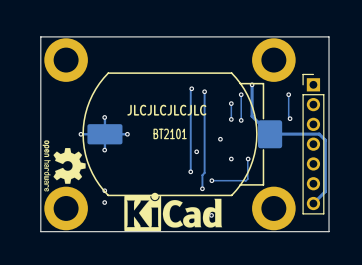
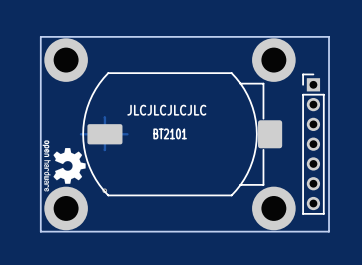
track: (252, 84) (252, 116) (270, 134) (319, 134) (325, 140) (325, 191) (313, 203) -> none
via: (252, 84) -> none
track: (191, 88) (190, 171) -> none
via: (191, 88) -> none
track: (204, 91) (204, 172) (202, 175) (202, 188) -> none
via: (204, 91) -> none
track: (241, 94) (241, 120) -> none
via: (241, 94) -> none
track: (288, 94) (290, 118) -> none
via: (288, 94) -> none
track: (231, 103) (231, 119) -> none
via: (231, 103) -> none
via: (104, 117) -> none
via: (290, 118) -> none
via: (231, 119) -> none
via: (241, 120) -> none
via: (80, 134) -> none
via: (127, 134) -> none
via: (220, 139) -> none
via: (104, 150) -> none
via: (196, 151) -> none
via: (231, 159) -> none
track: (248, 159) (246, 180) (211, 180) -> none
via: (248, 159) -> none
via: (190, 171) -> none
via: (211, 180) -> none
via: (202, 188) -> none
drawing: [124, 192, 223, 232] -> none
via: (104, 202) -> none
via: (211, 215) -> none

